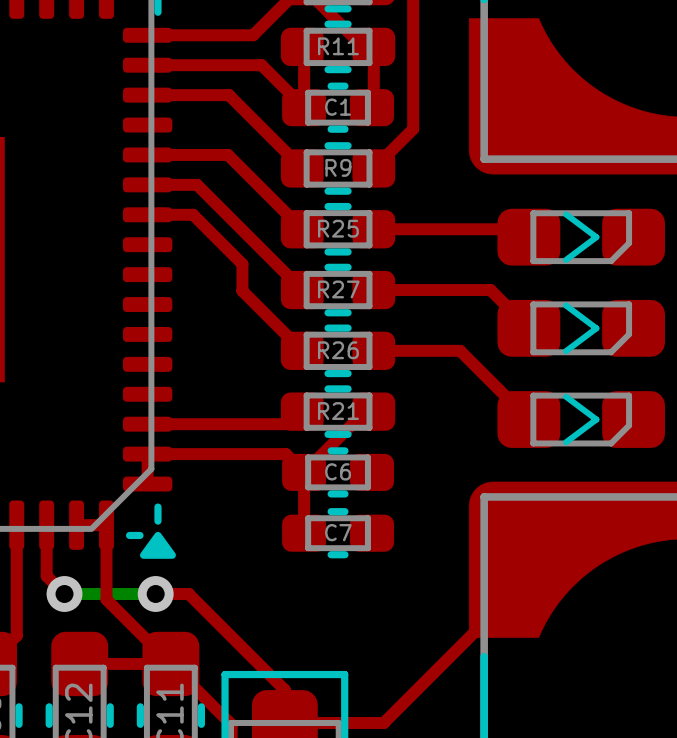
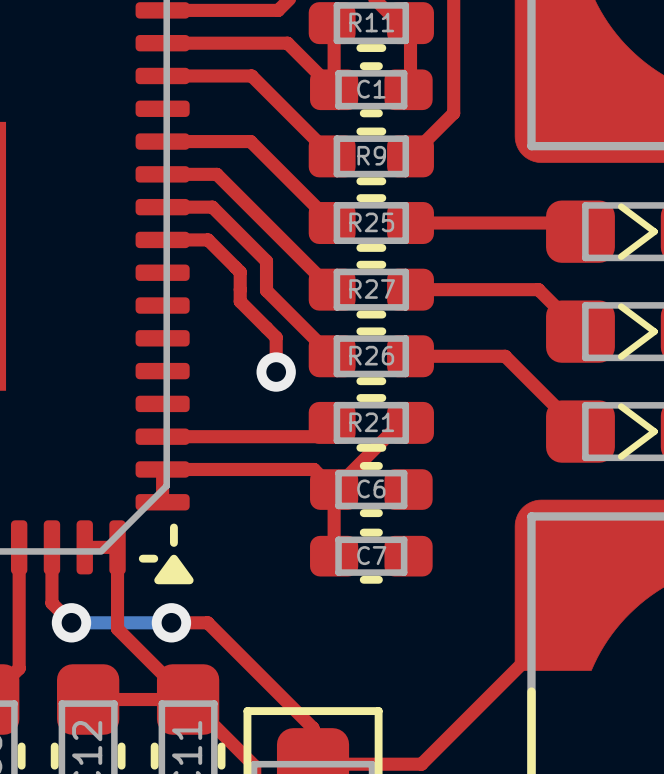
top track: none -> (162, 239) (208, 239) (240, 272) (240, 301) (276, 337) (276, 372)
via: none -> (276, 372)

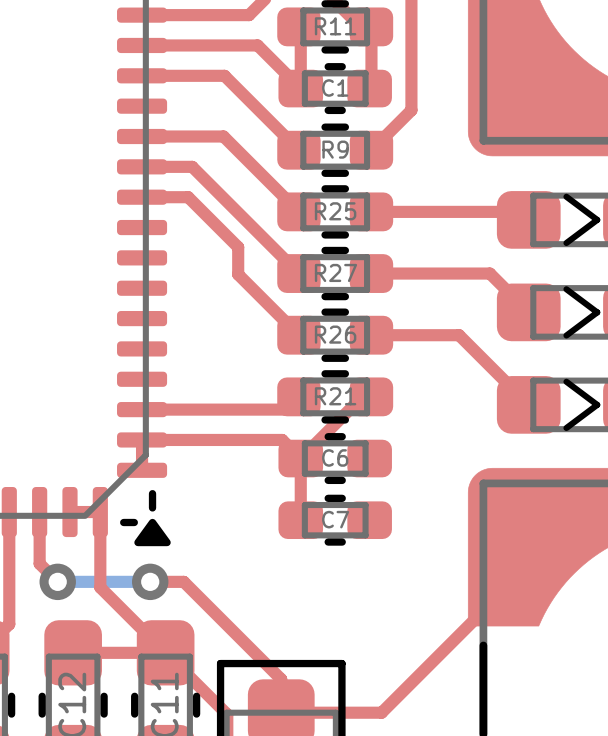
top track: (162, 239) (208, 239) (240, 272) (240, 301) (276, 337) (276, 372) -> none
via: (276, 372) -> none

